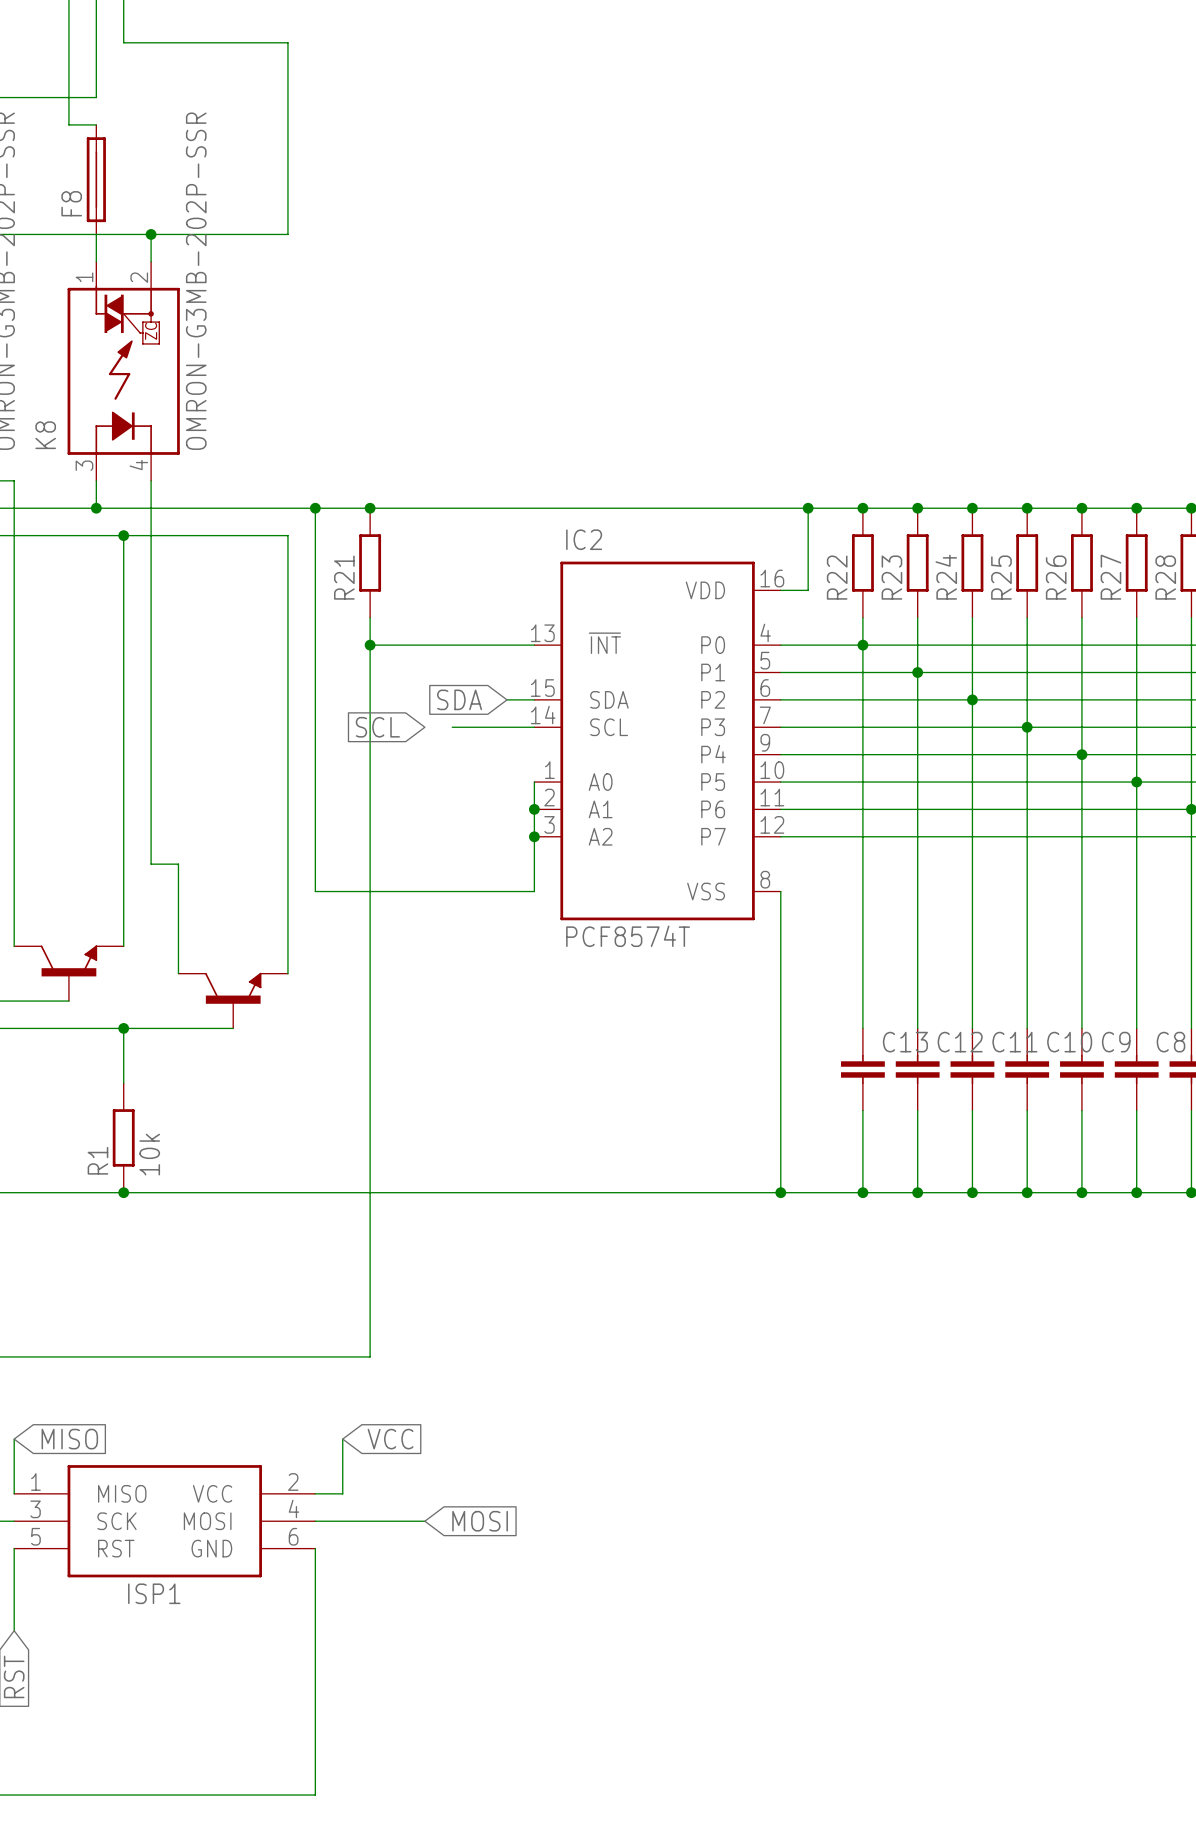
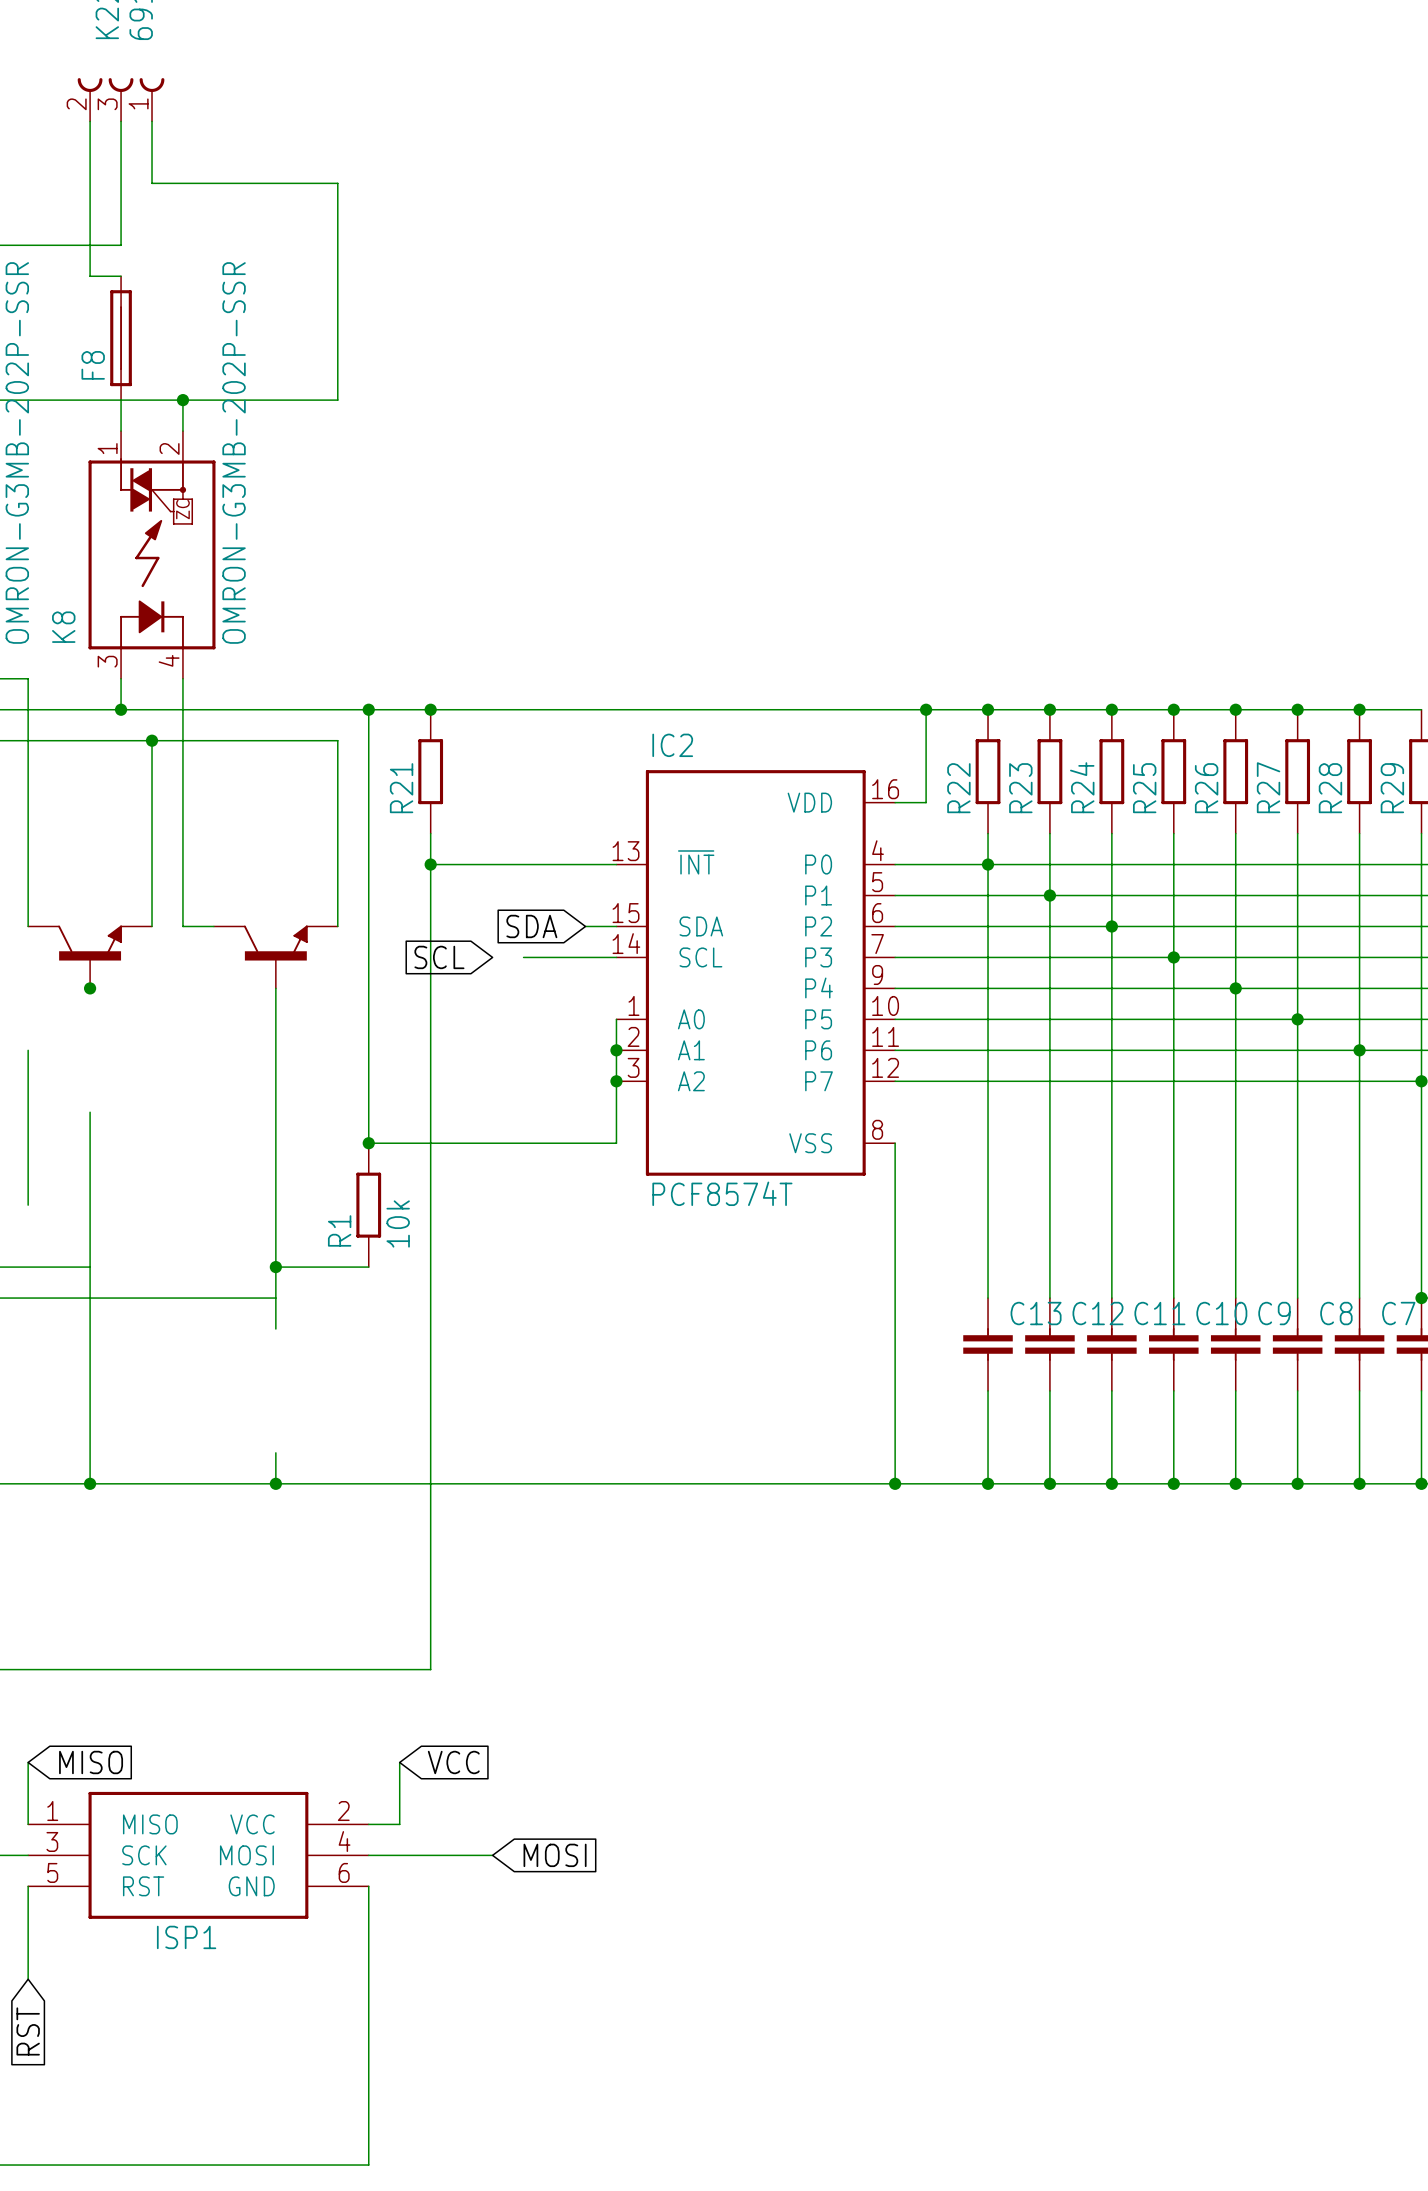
wire: (14, 699) (14, 809) -> none
wire: (123, 699) (123, 946) -> none
wire: (151, 699) (151, 864) (178, 864) (178, 973) -> (182, 926) (213, 926)
wire: (287, 699) (287, 973) -> none
part: none -> (90, 956)
part: none -> (275, 956)
junction: none -> (90, 988)
wire: none -> (275, 988) (275, 1329)
wire: none -> (90, 1112) (90, 1483)
junction: none -> (368, 1143)
part: (68, 973) -> none
part: (233, 1000) -> none
wire: none -> (275, 1267) (368, 1267)
junction: none -> (275, 1267)
wire: (123, 1028) (123, 1083) -> none
junction: (123, 1028) -> none
R1 position: (123, 1137) -> (368, 1205)
wire: none -> (275, 1452) (275, 1483)
junction: none -> (90, 1483)
junction: (123, 1192) -> none
junction: none -> (275, 1483)

